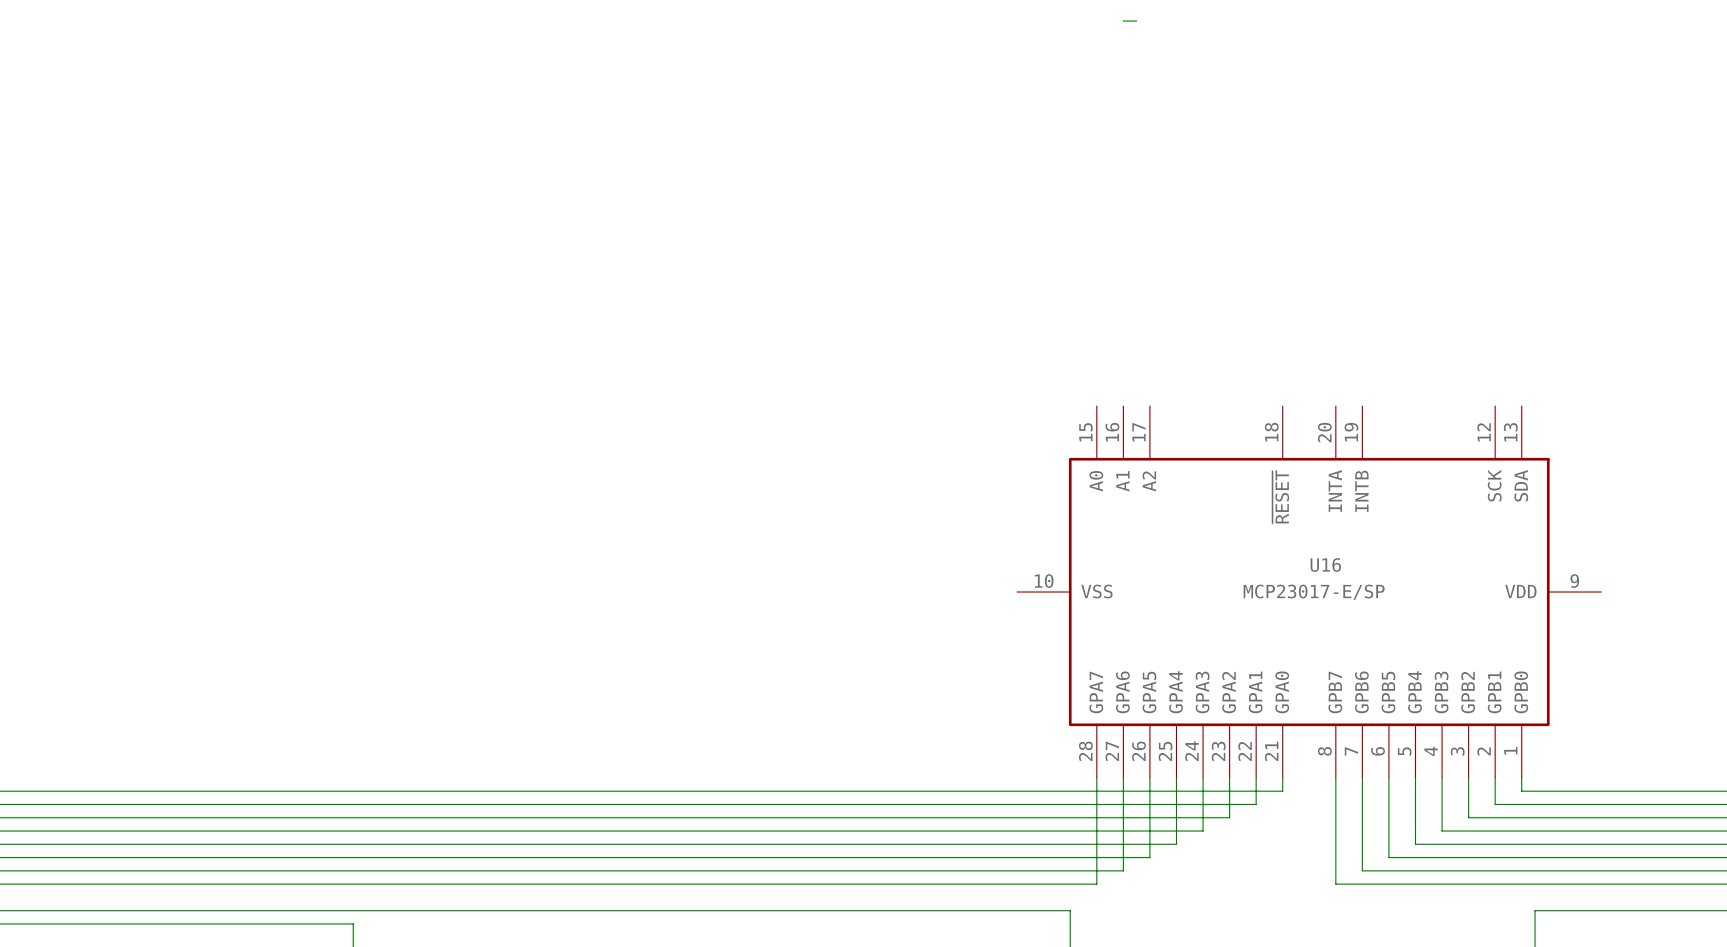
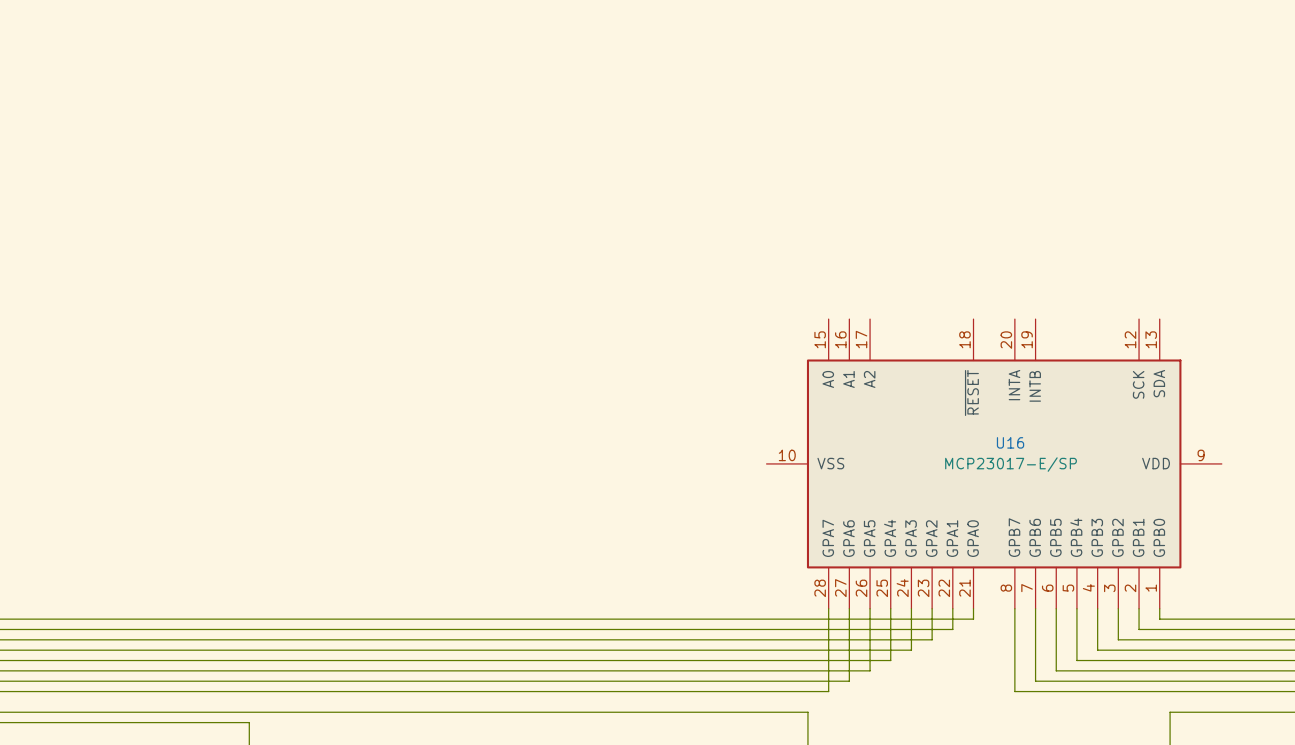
wire: (1123, 21) (1136, 21) -> none

